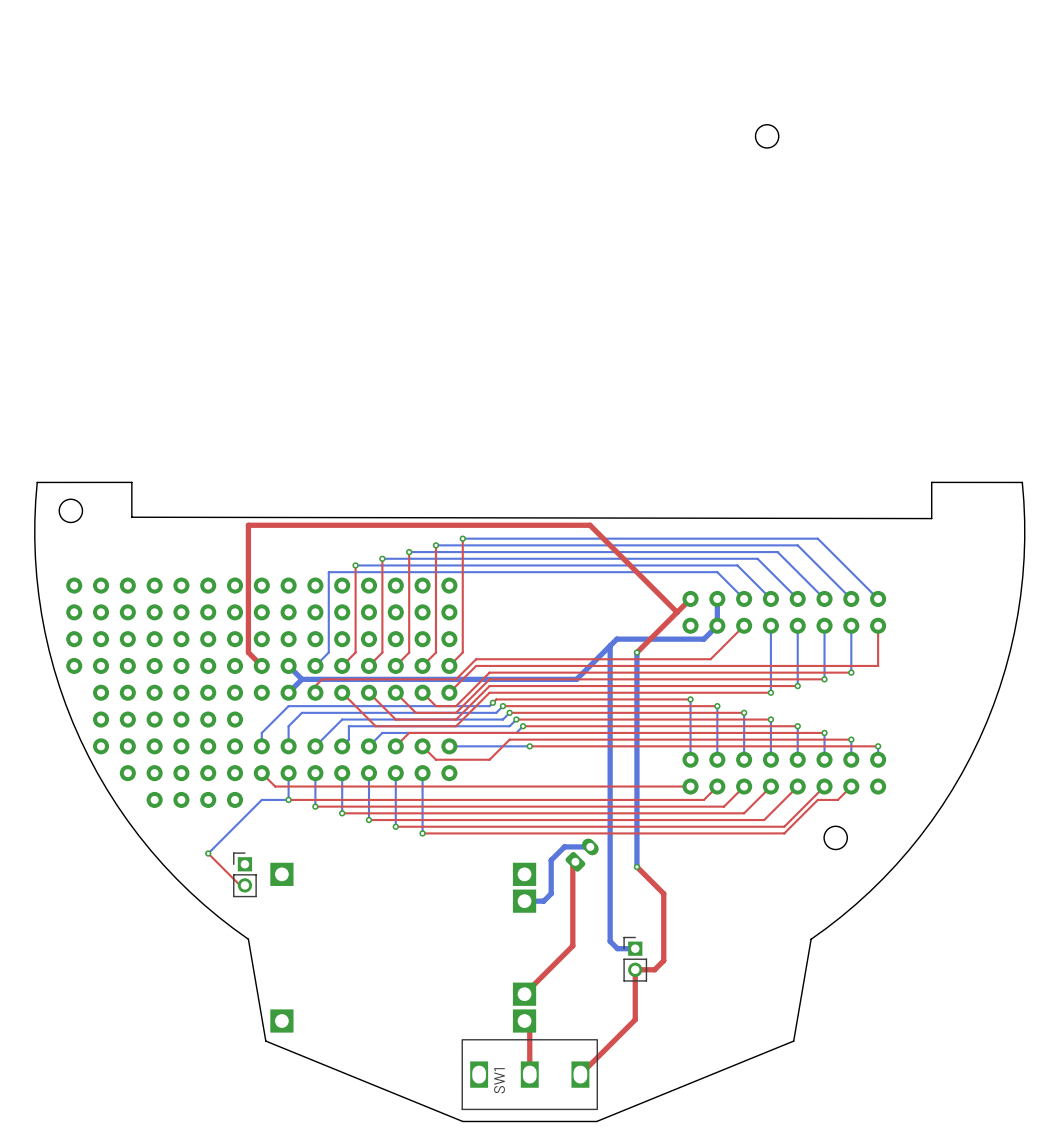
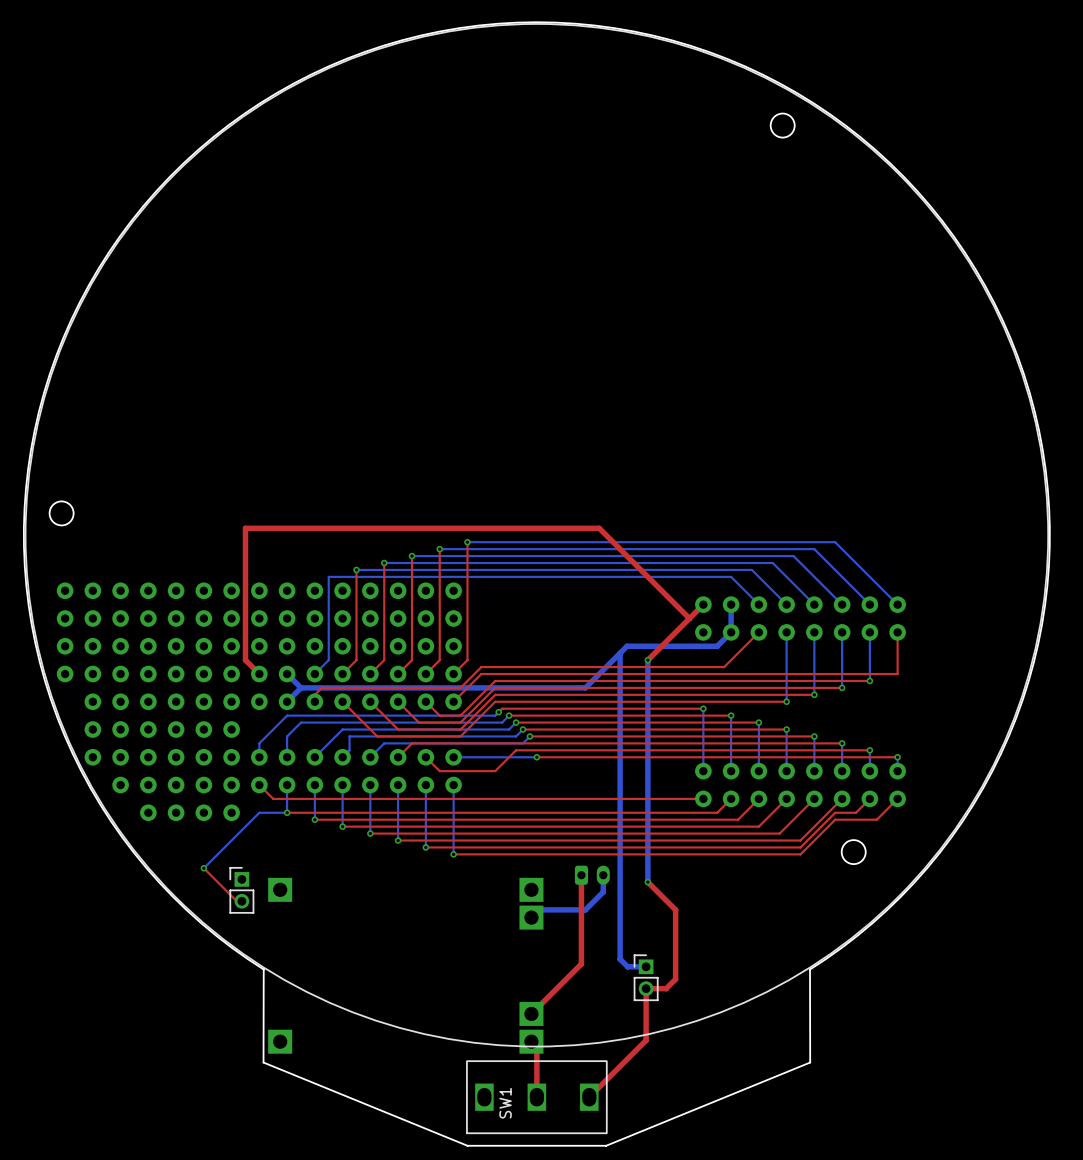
drawing: none -> [25, 23, 1049, 1048]
bottom track: none -> (453, 785) (453, 854)
top track: none -> (897, 798) (876, 819) (835, 819) (800, 854) (453, 854)
via: none -> (453, 854)
bottom track: (590, 846) (564, 846) (551, 860) (551, 893) (543, 901) (524, 901) -> (603, 875) (603, 892) (585, 909) (539, 909) (531, 917)
part rotation: 0° (582, 855) -> 45° clockwise (592, 875)
board edge: (265, 1041) (248, 939) (203, 904) (151, 850) (107, 789) (72, 722) (54, 669) (41, 613) (35, 557) (37, 482) (131, 482) (131, 517) (931, 518) (931, 482) (1022, 482) (1024, 538) (1017, 613) (1005, 669) (986, 722) (961, 773) (920, 836) (869, 891) (811, 939) (793, 1041) -> (263, 1062) (263, 969) (216, 935) (186, 910) (134, 853) (100, 805) (81, 771) (50, 699) (31, 624) (24, 566) (25, 488) (38, 411) (49, 374) (71, 320) (108, 252) (156, 190) (198, 149) (228, 125) (293, 83) (328, 66) (383, 45) (459, 28) (536, 22) (575, 23) (633, 31) (708, 51) (779, 83) (845, 125) (903, 176) (929, 205) (964, 252) (994, 302) (1010, 338) (1034, 411) (1045, 469) (1049, 546) (1042, 624) (1022, 699) (1000, 753) (983, 788) (939, 853) (914, 882) (872, 923) (810, 969) (810, 1062)

